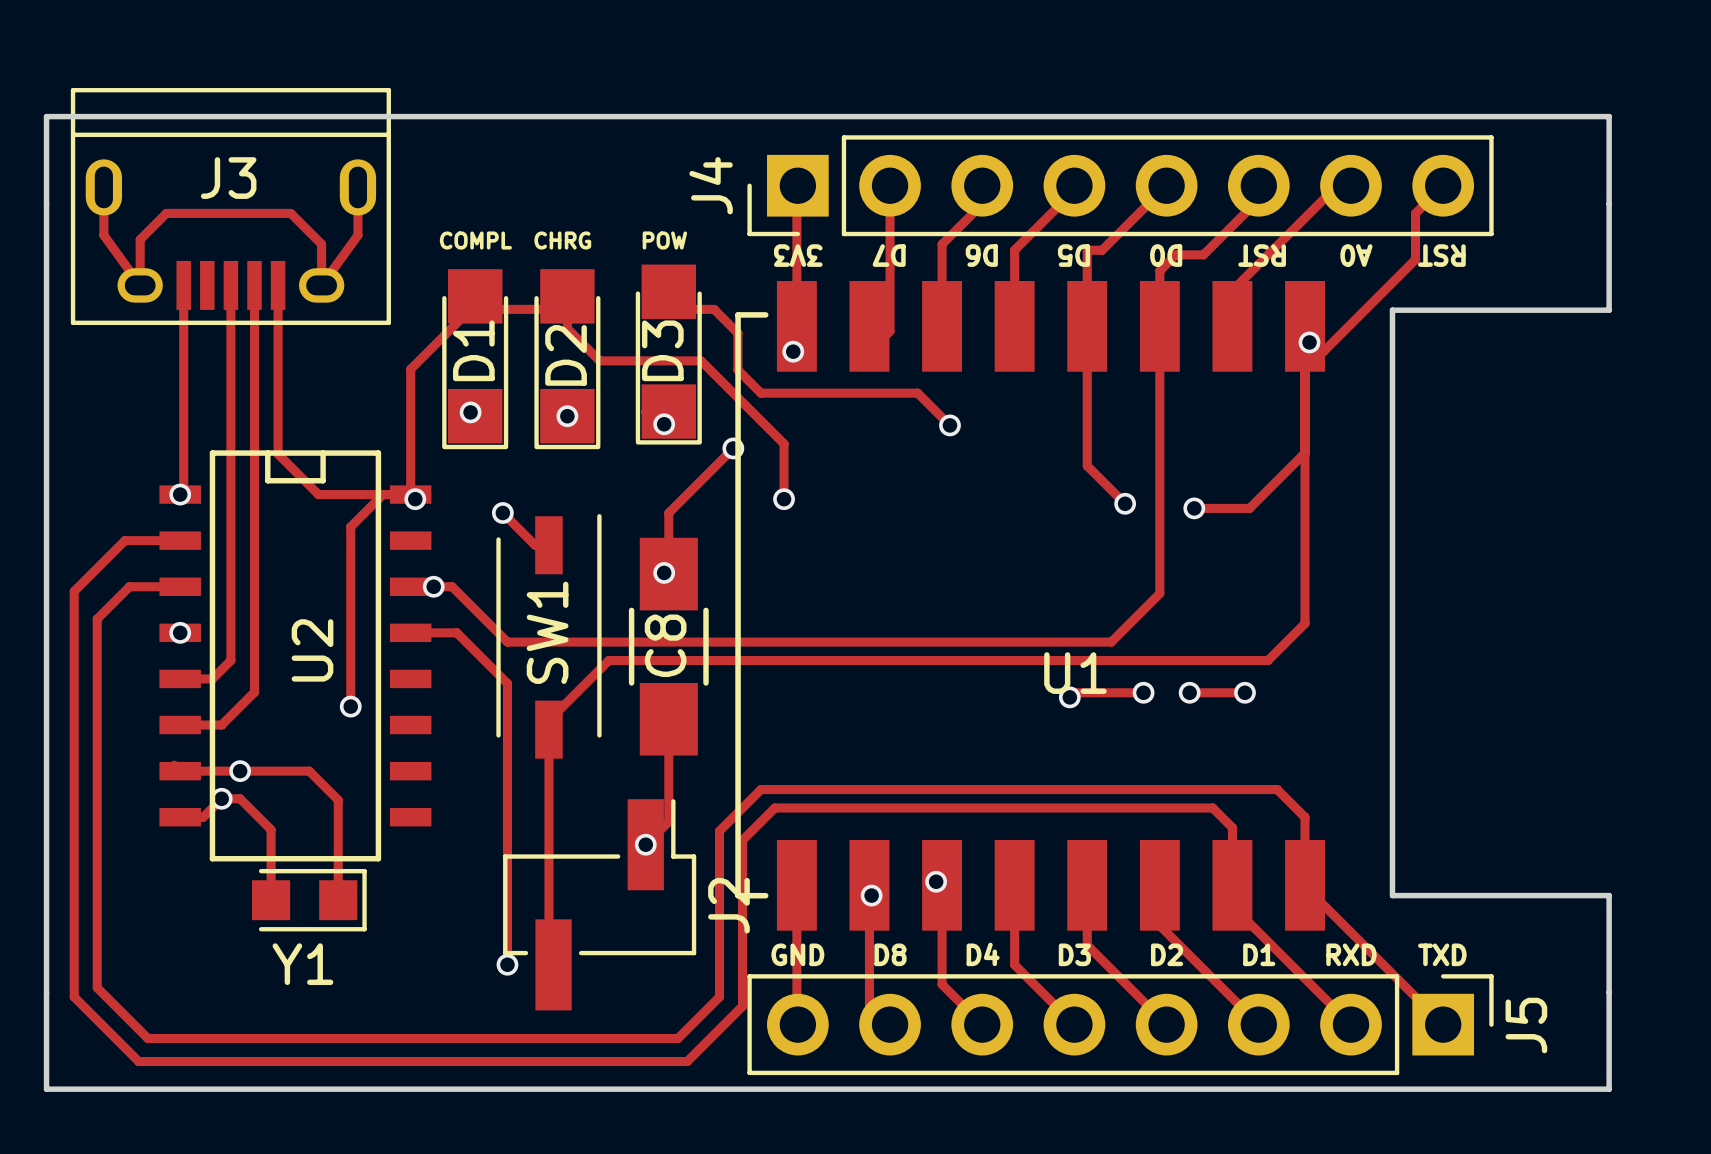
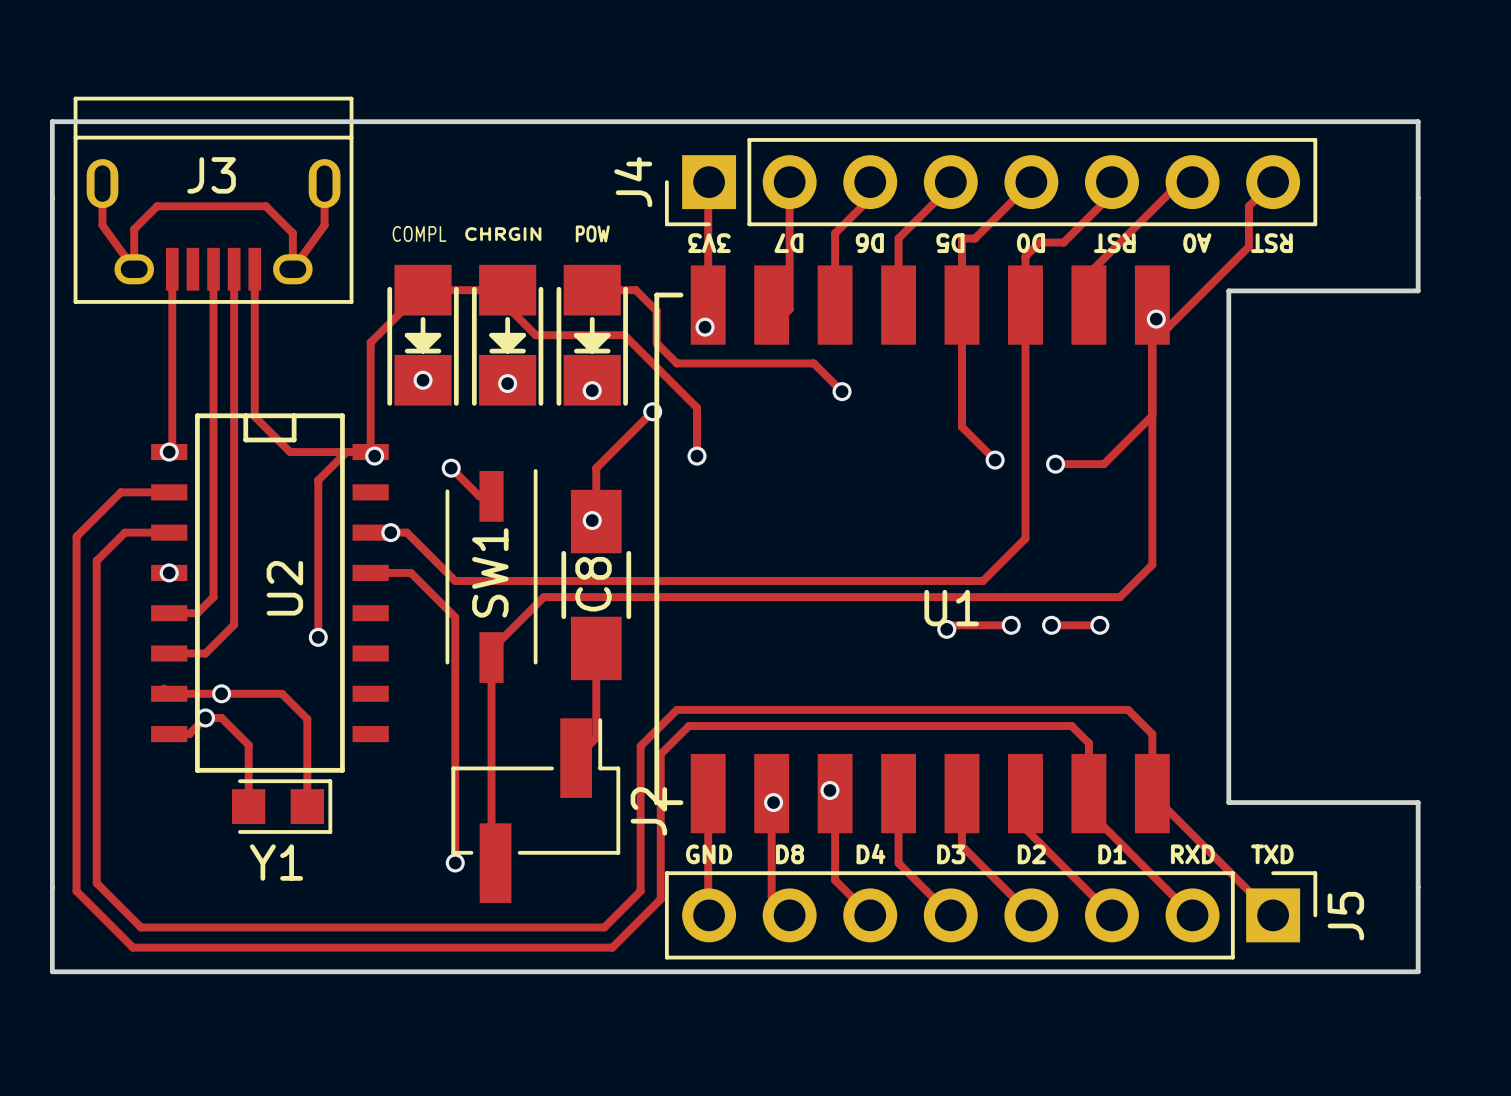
text: COMPL (475, 240) -> none
text: CHRG (562, 240) -> none
text: POW (664, 240) -> none
D3: (668, 354) -> none
D1: (475, 359) -> none
D2: (567, 359) -> none
COMPL: none -> (423, 335)
CHRGIN: none -> (507, 335)
POW: none -> (592, 335)
via: (645, 844) -> none

